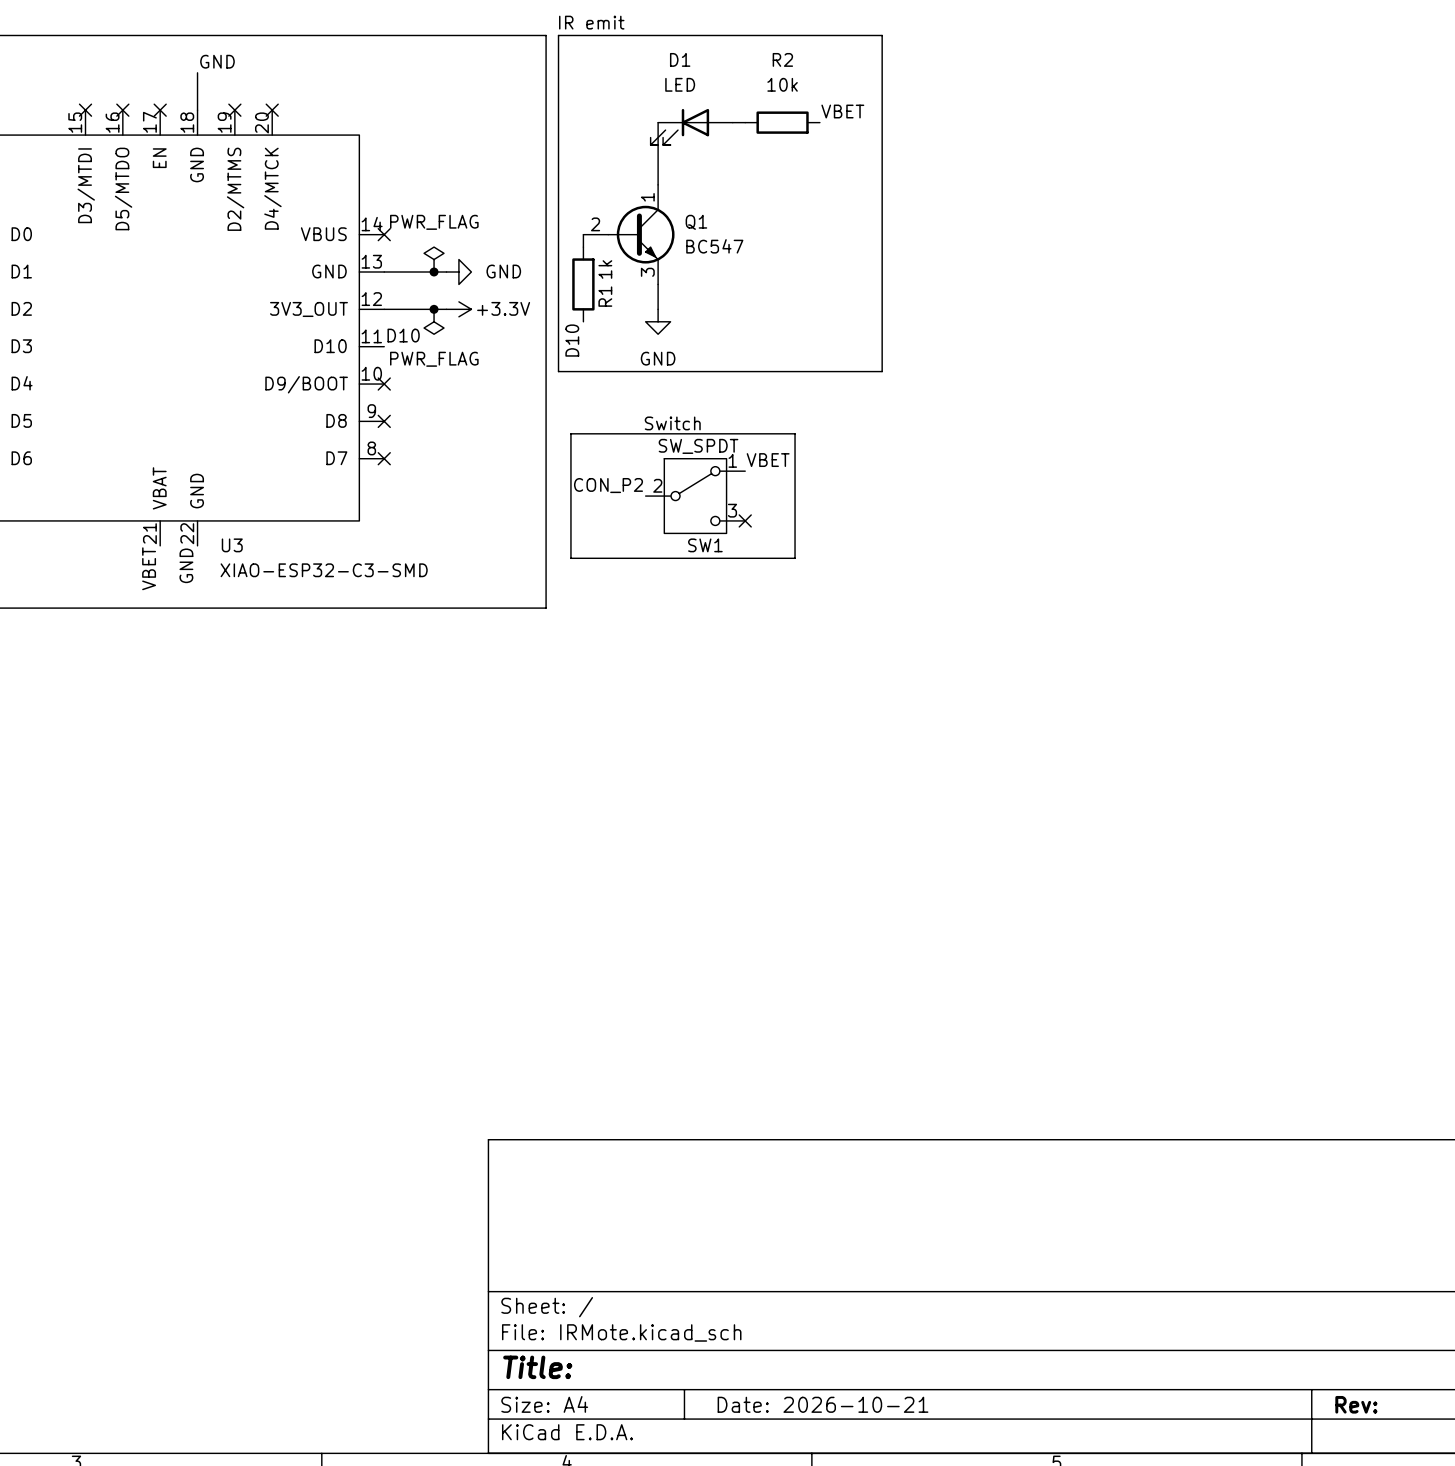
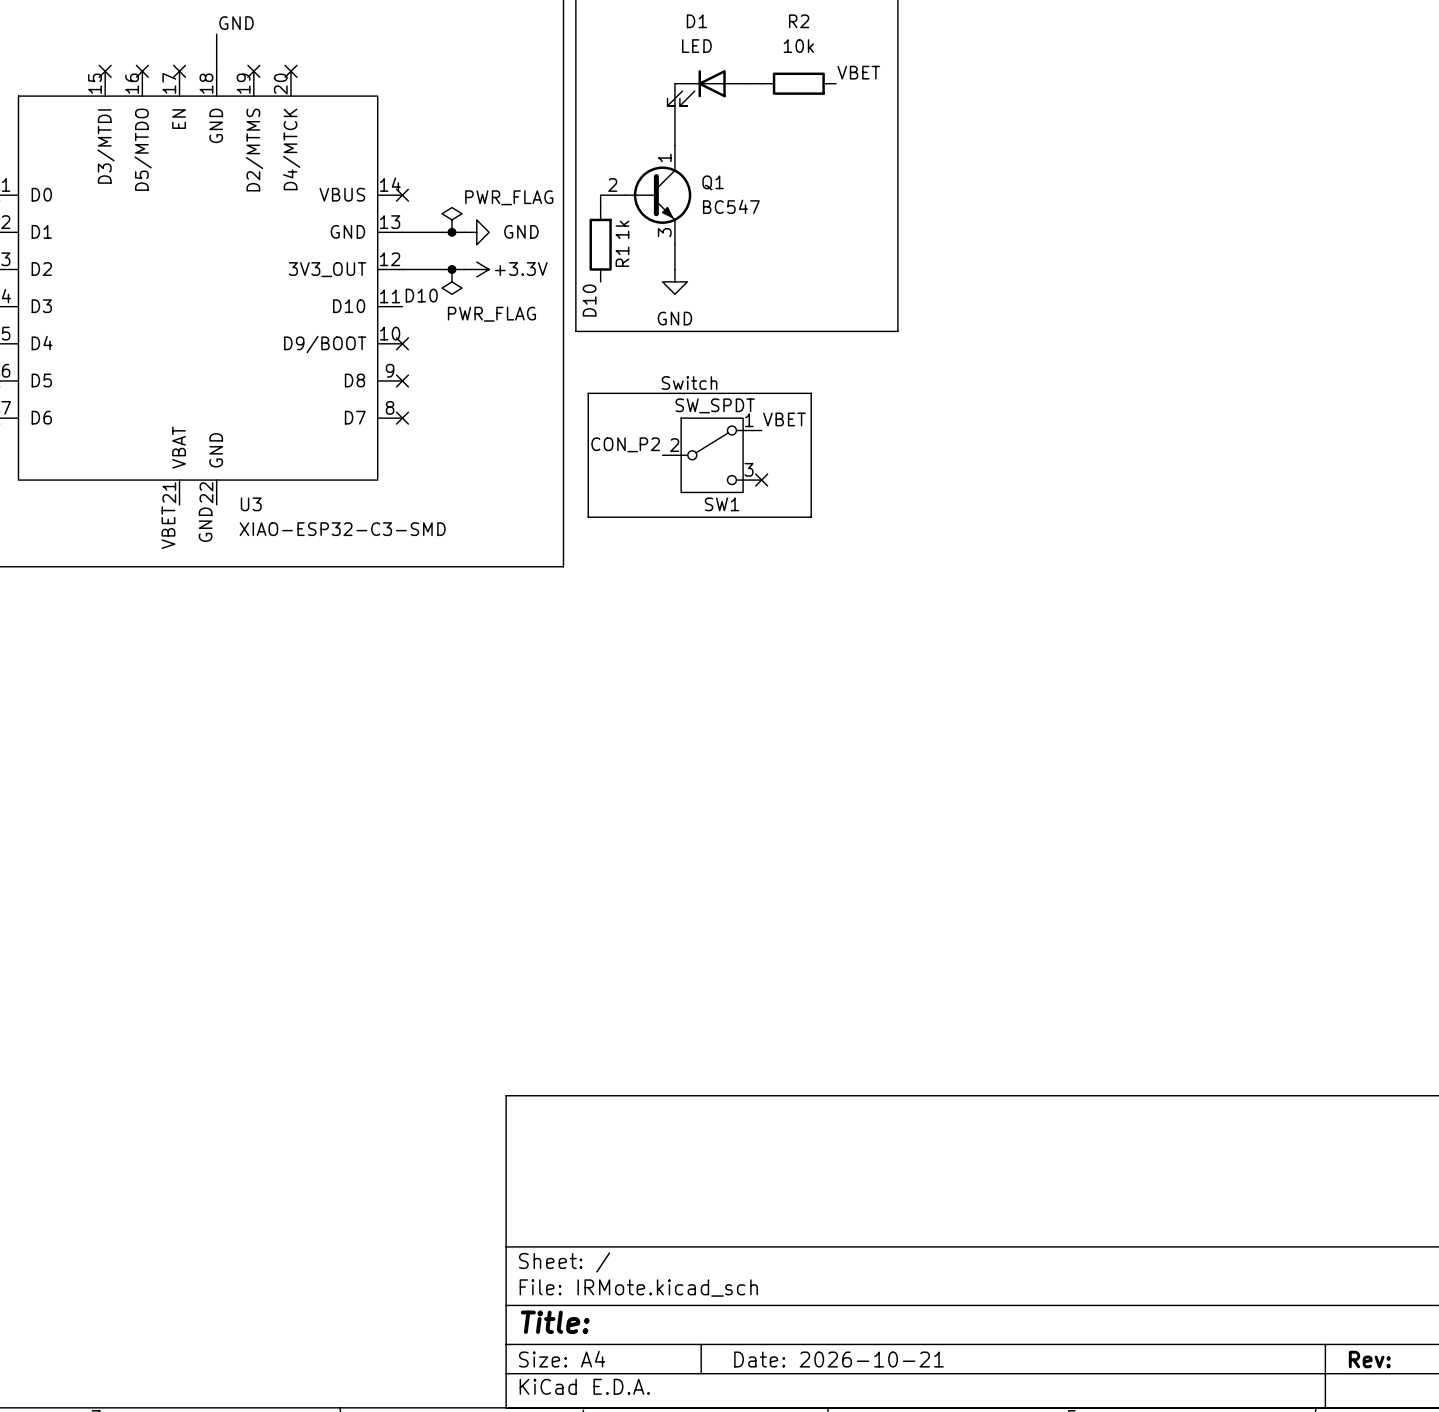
power symbol text position: PWR_FLAG (434, 222) -> PWR_FLAG (509, 197)
power symbol text position: PWR_FLAG (434, 359) -> PWR_FLAG (491, 314)

